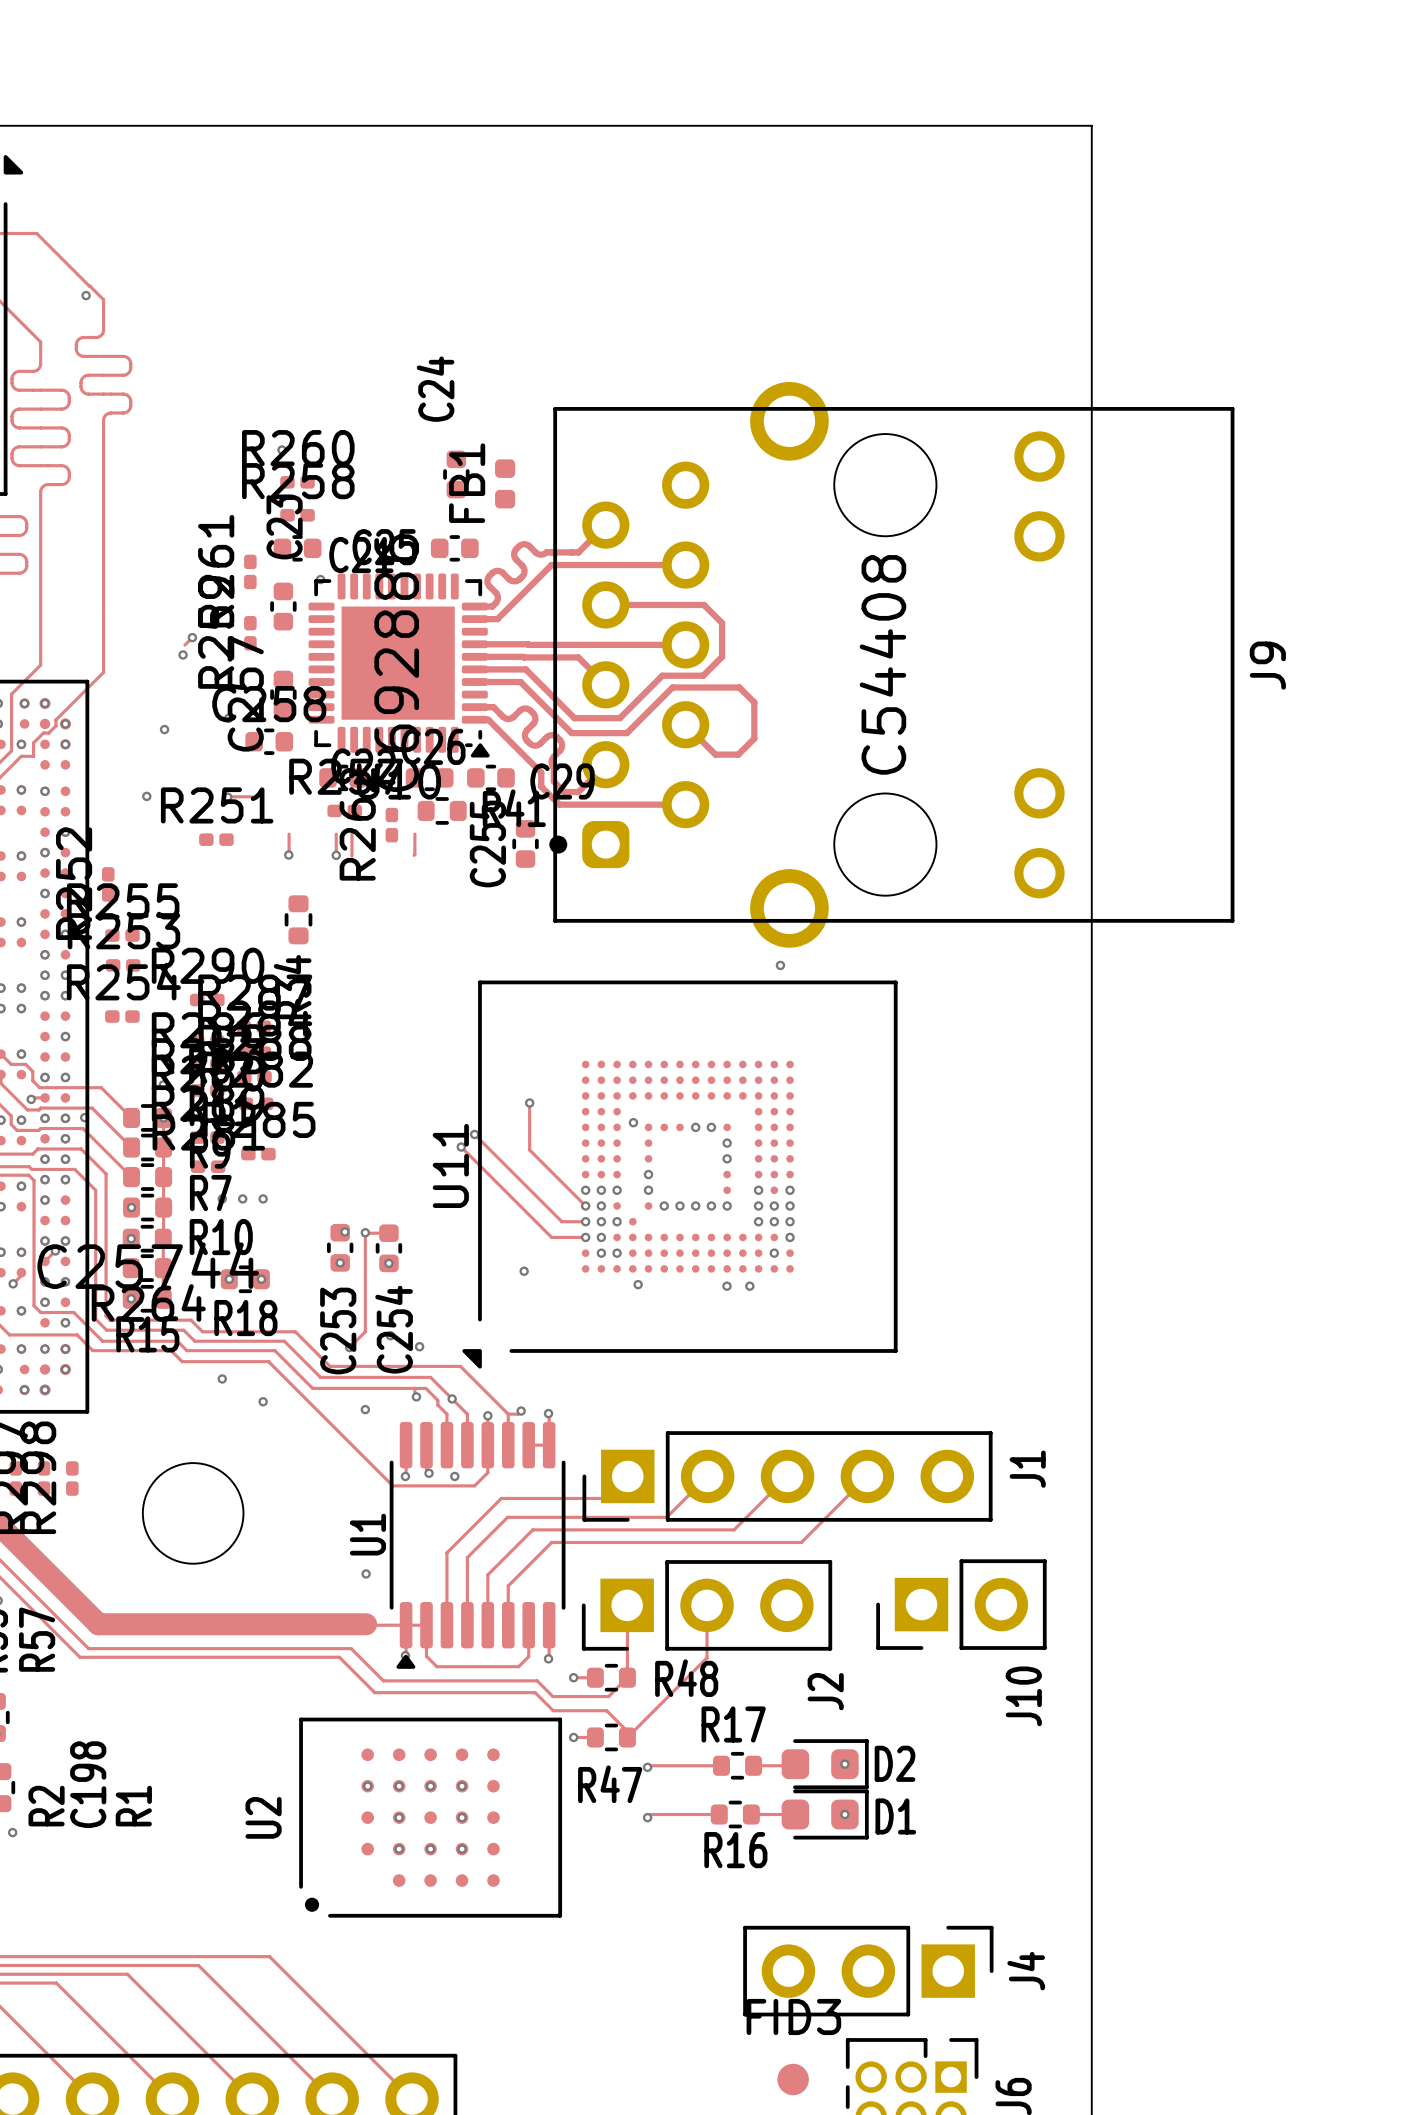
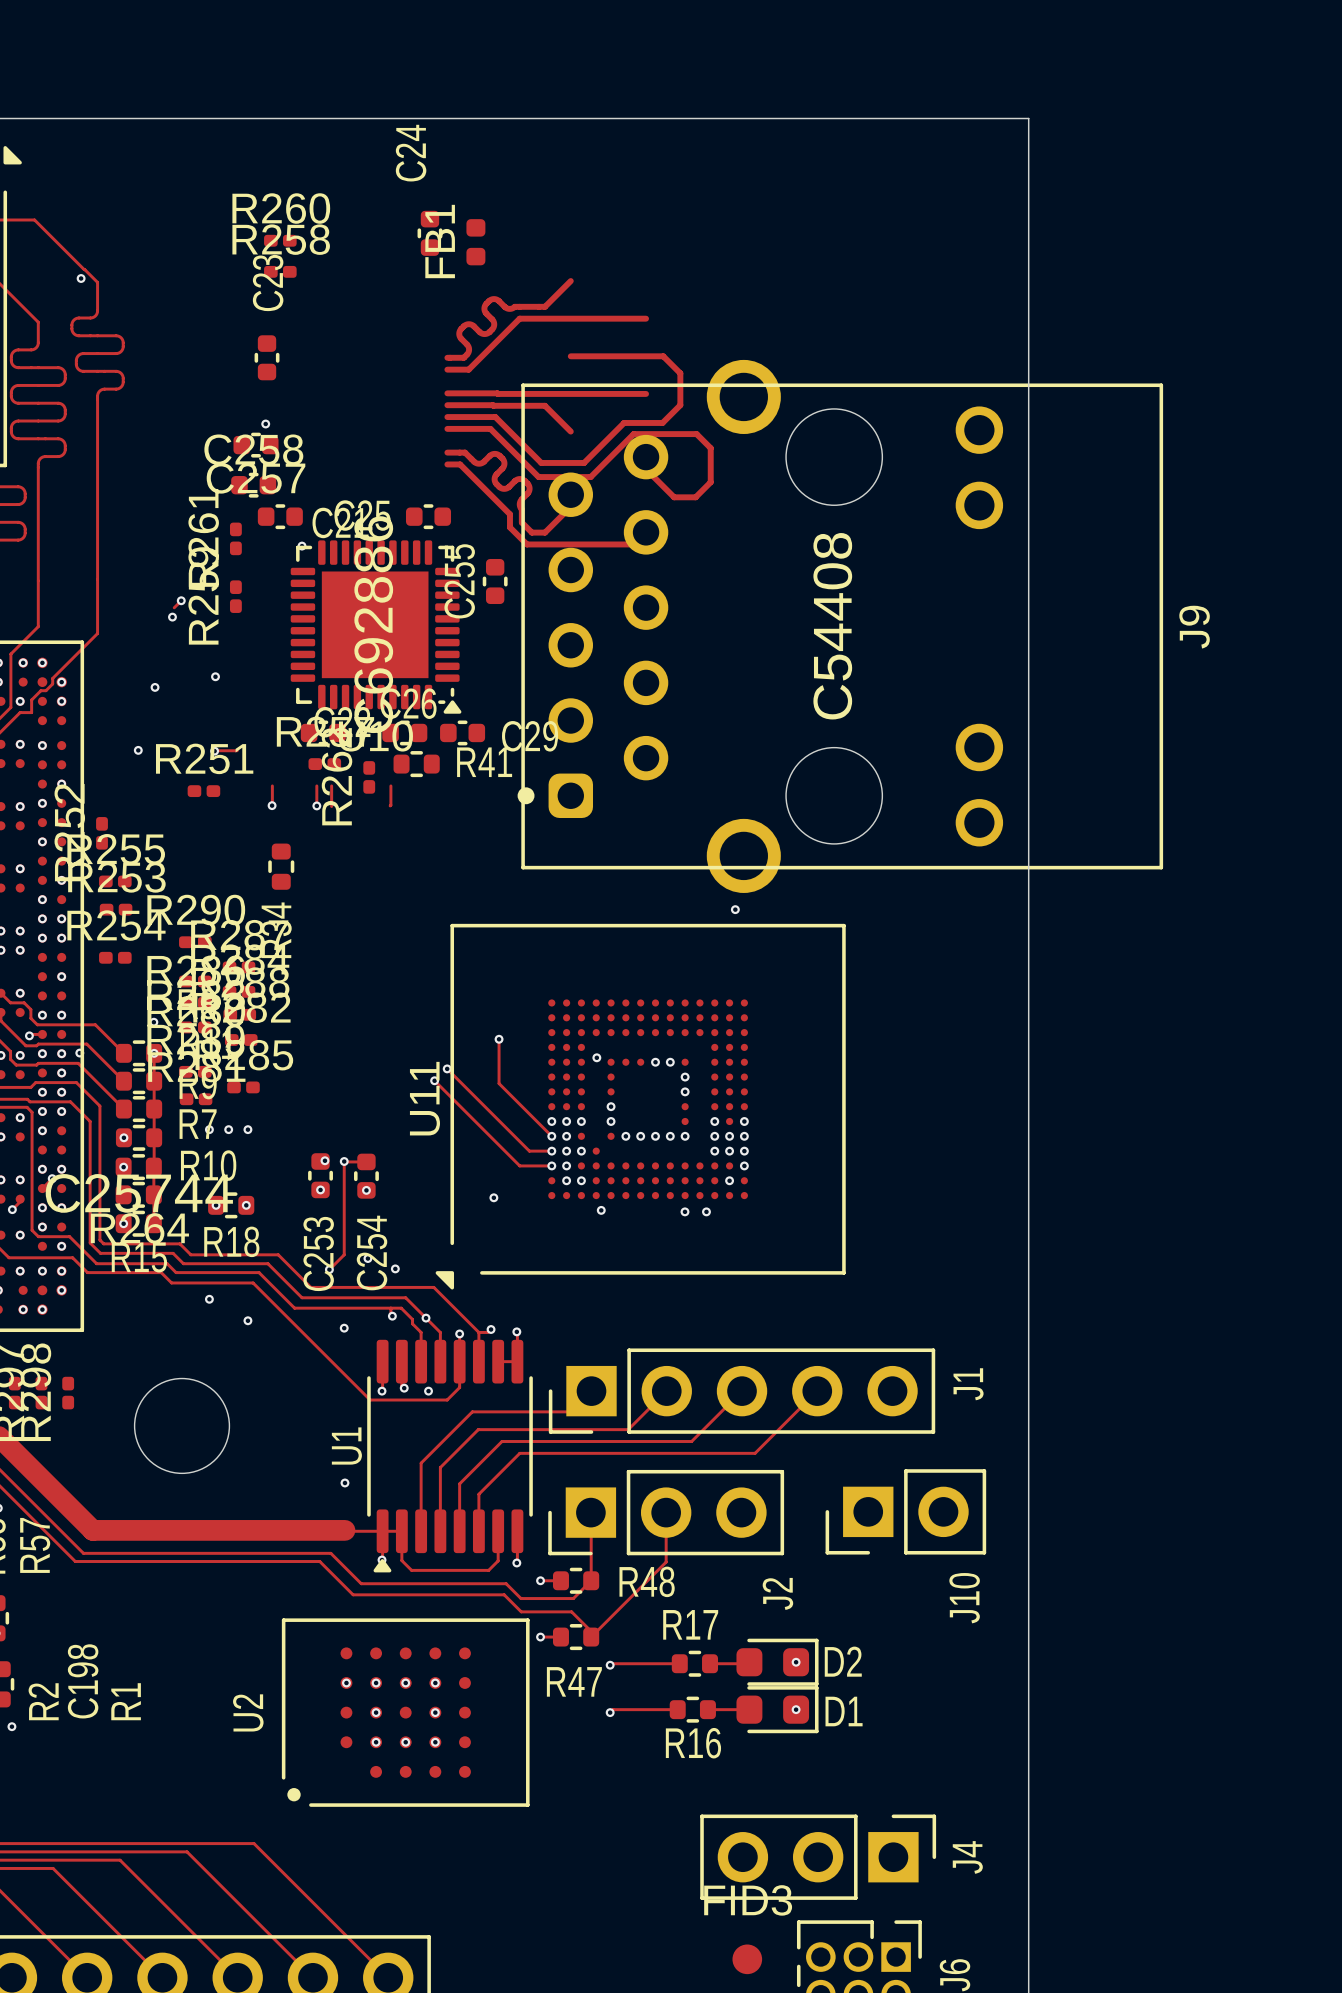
C24 position: (456, 474) -> (429, 233)
R260 position: (297, 482) -> (280, 240)
FB1 position: (505, 483) -> (475, 242)
R258 position: (297, 515) -> (280, 271)
track: (605, 525) (578, 552) (546, 552) (540, 554) (527, 544) (520, 545) (515, 550) (514, 555) (523, 568) (523, 575) (518, 580) (513, 581) (500, 571) (493, 572) (488, 577) (487, 581) (497, 594) (496, 601) (492, 606) (474, 606) -> (570, 281) (545, 306) (514, 306) (508, 308) (497, 299) (490, 300) (485, 304) (484, 309) (493, 321) (492, 328) (483, 334) (471, 324) (465, 325) (460, 330) (459, 334) (468, 346) (468, 353) (463, 357) (447, 357)
track: (685, 565) (551, 565) (497, 619) (474, 619) -> (646, 318) (519, 318) (468, 369) (447, 369)
track: (605, 604) (704, 604) (722, 623) (722, 656) (703, 675) (662, 675) (619, 718) (574, 718) (525, 669) (474, 669) -> (570, 356) (663, 356) (680, 373) (680, 405) (662, 422) (624, 422) (584, 462) (541, 462) (495, 417) (447, 417)
C23 position: (283, 606) -> (267, 357)
track: (474, 644) (685, 644) -> (447, 393) (646, 393)
track: (474, 656) (578, 657) (605, 684) -> (447, 405) (545, 405) (570, 431)
track: (474, 682) (520, 682) (571, 733) (626, 733) (672, 687) (739, 687) (754, 702) (754, 738) (738, 754) (715, 754) (685, 724) -> (447, 428) (490, 428) (538, 477) (590, 477) (633, 434) (696, 434) (710, 448) (710, 482) (695, 497) (674, 497) (646, 469)
C257 rotation: 0° (283, 694) -> 90° clockwise (256, 445)
C257 position: (283, 694) -> (256, 445)
track: (474, 707) (493, 707) (507, 718) (512, 717) (522, 708) (530, 710) (535, 719) (525, 732) (527, 740) (531, 744) (536, 745) (551, 735) (561, 742) (561, 748) (552, 758) (551, 762) (553, 767) (553, 781) (564, 792) (578, 792) (605, 764) -> (447, 452) (465, 452) (478, 463) (482, 462) (492, 454) (499, 455) (504, 464) (495, 476) (496, 484) (501, 488) (505, 488) (519, 479) (528, 485) (528, 491) (520, 500) (519, 505) (521, 509) (521, 522) (531, 532) (545, 532) (570, 506)
track: (474, 719) (488, 719) (541, 772) (541, 786) (559, 804) (685, 804) -> (447, 464) (460, 464) (509, 514) (509, 527) (527, 544) (646, 544)
C258 position: (269, 741) -> (253, 485)
C255 position: (525, 843) -> (495, 581)

